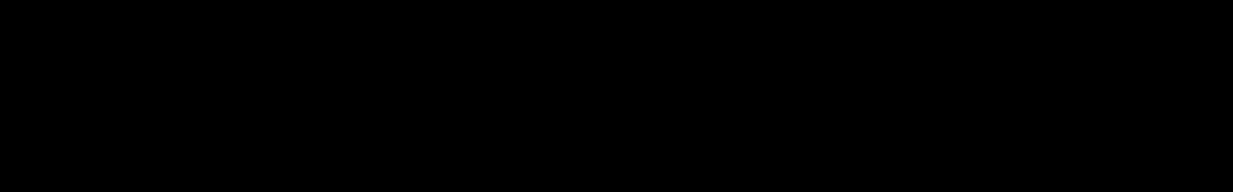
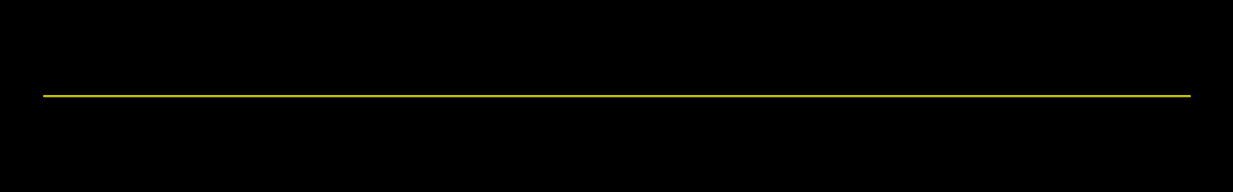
board edge: none -> (1189, 96) (44, 96)

